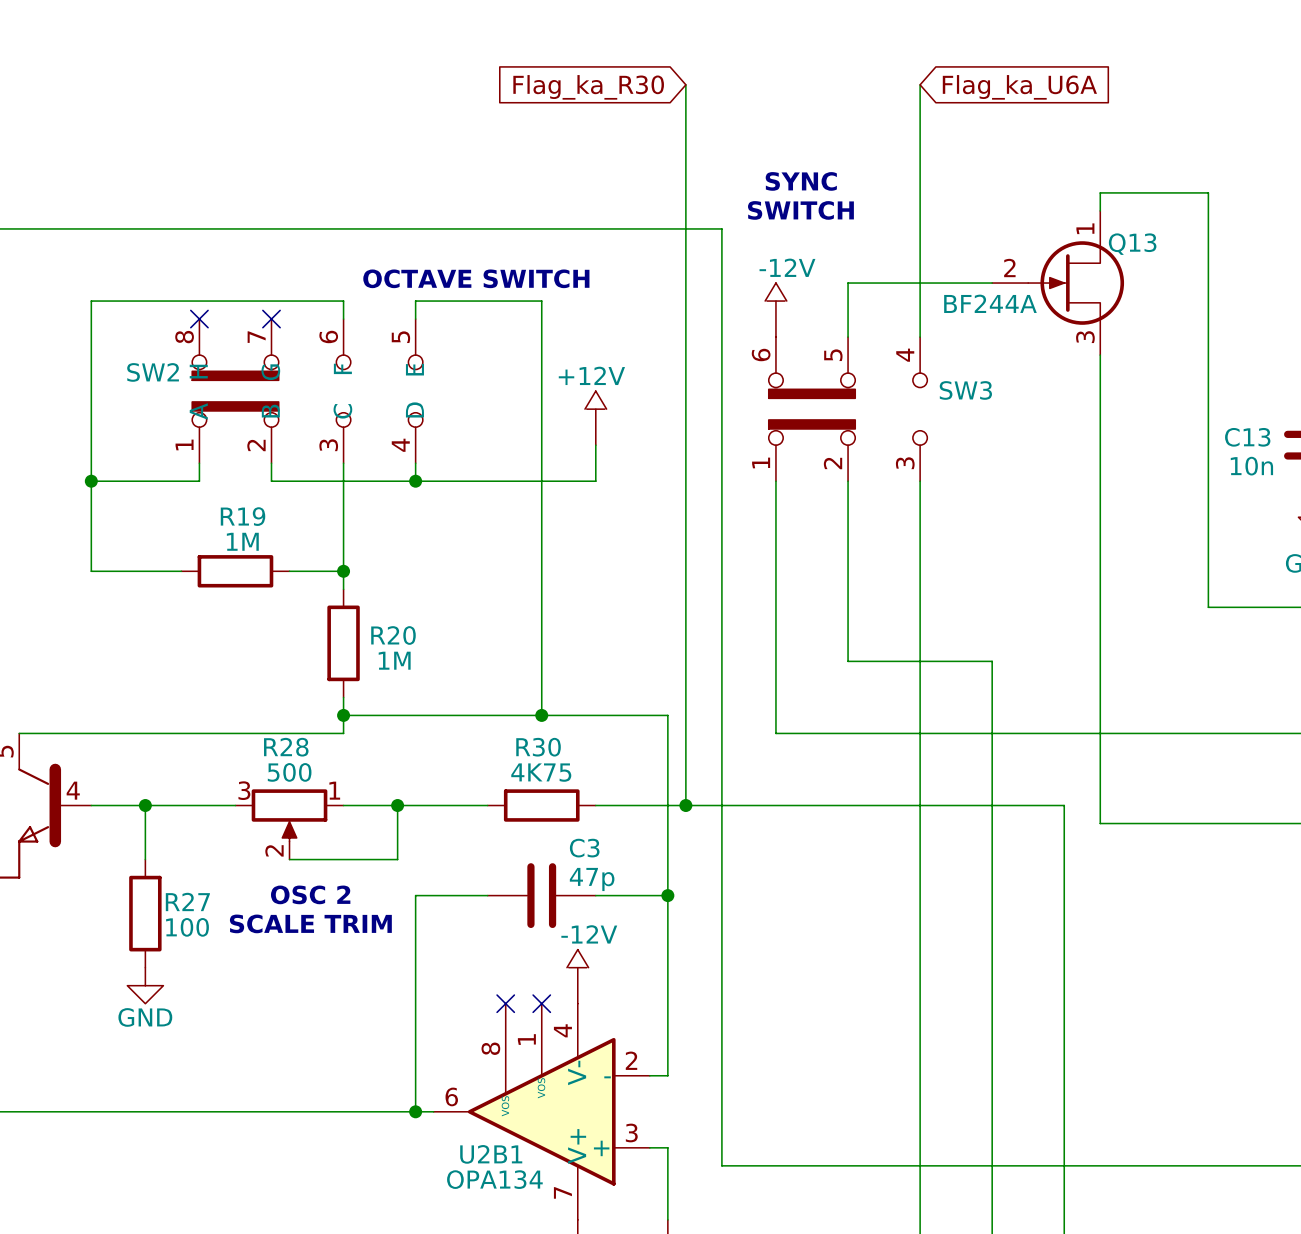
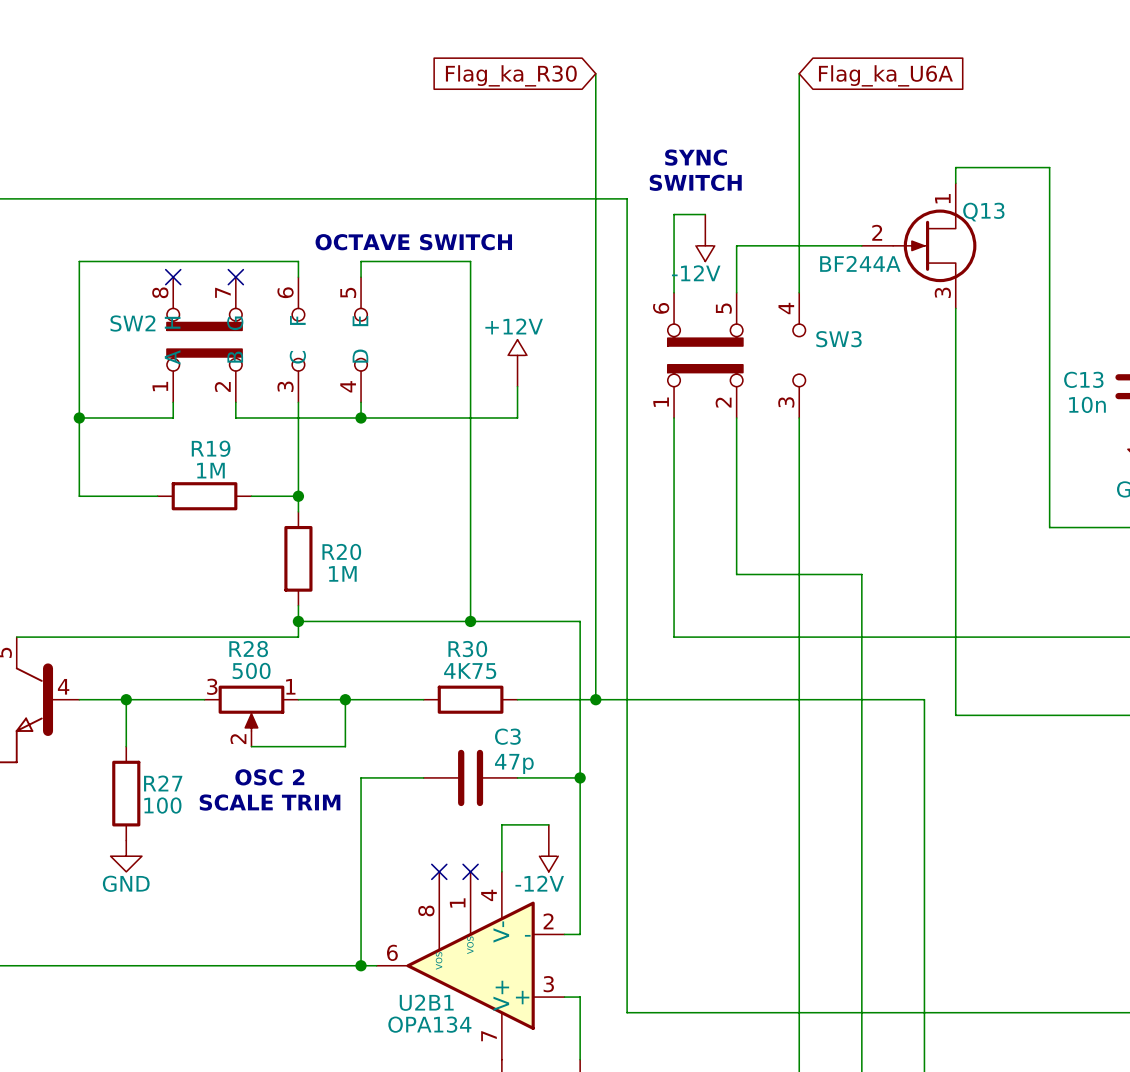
wire: none -> (705, 214) (674, 214) (674, 292)
part rotation: 0° (775, 292) -> 180° (705, 253)
part position: (775, 310) -> (705, 238)
wire: none -> (548, 824) (501, 824) (501, 871)
part rotation: 0° (577, 958) -> 180° (548, 864)
part position: (577, 976) -> (548, 848)

